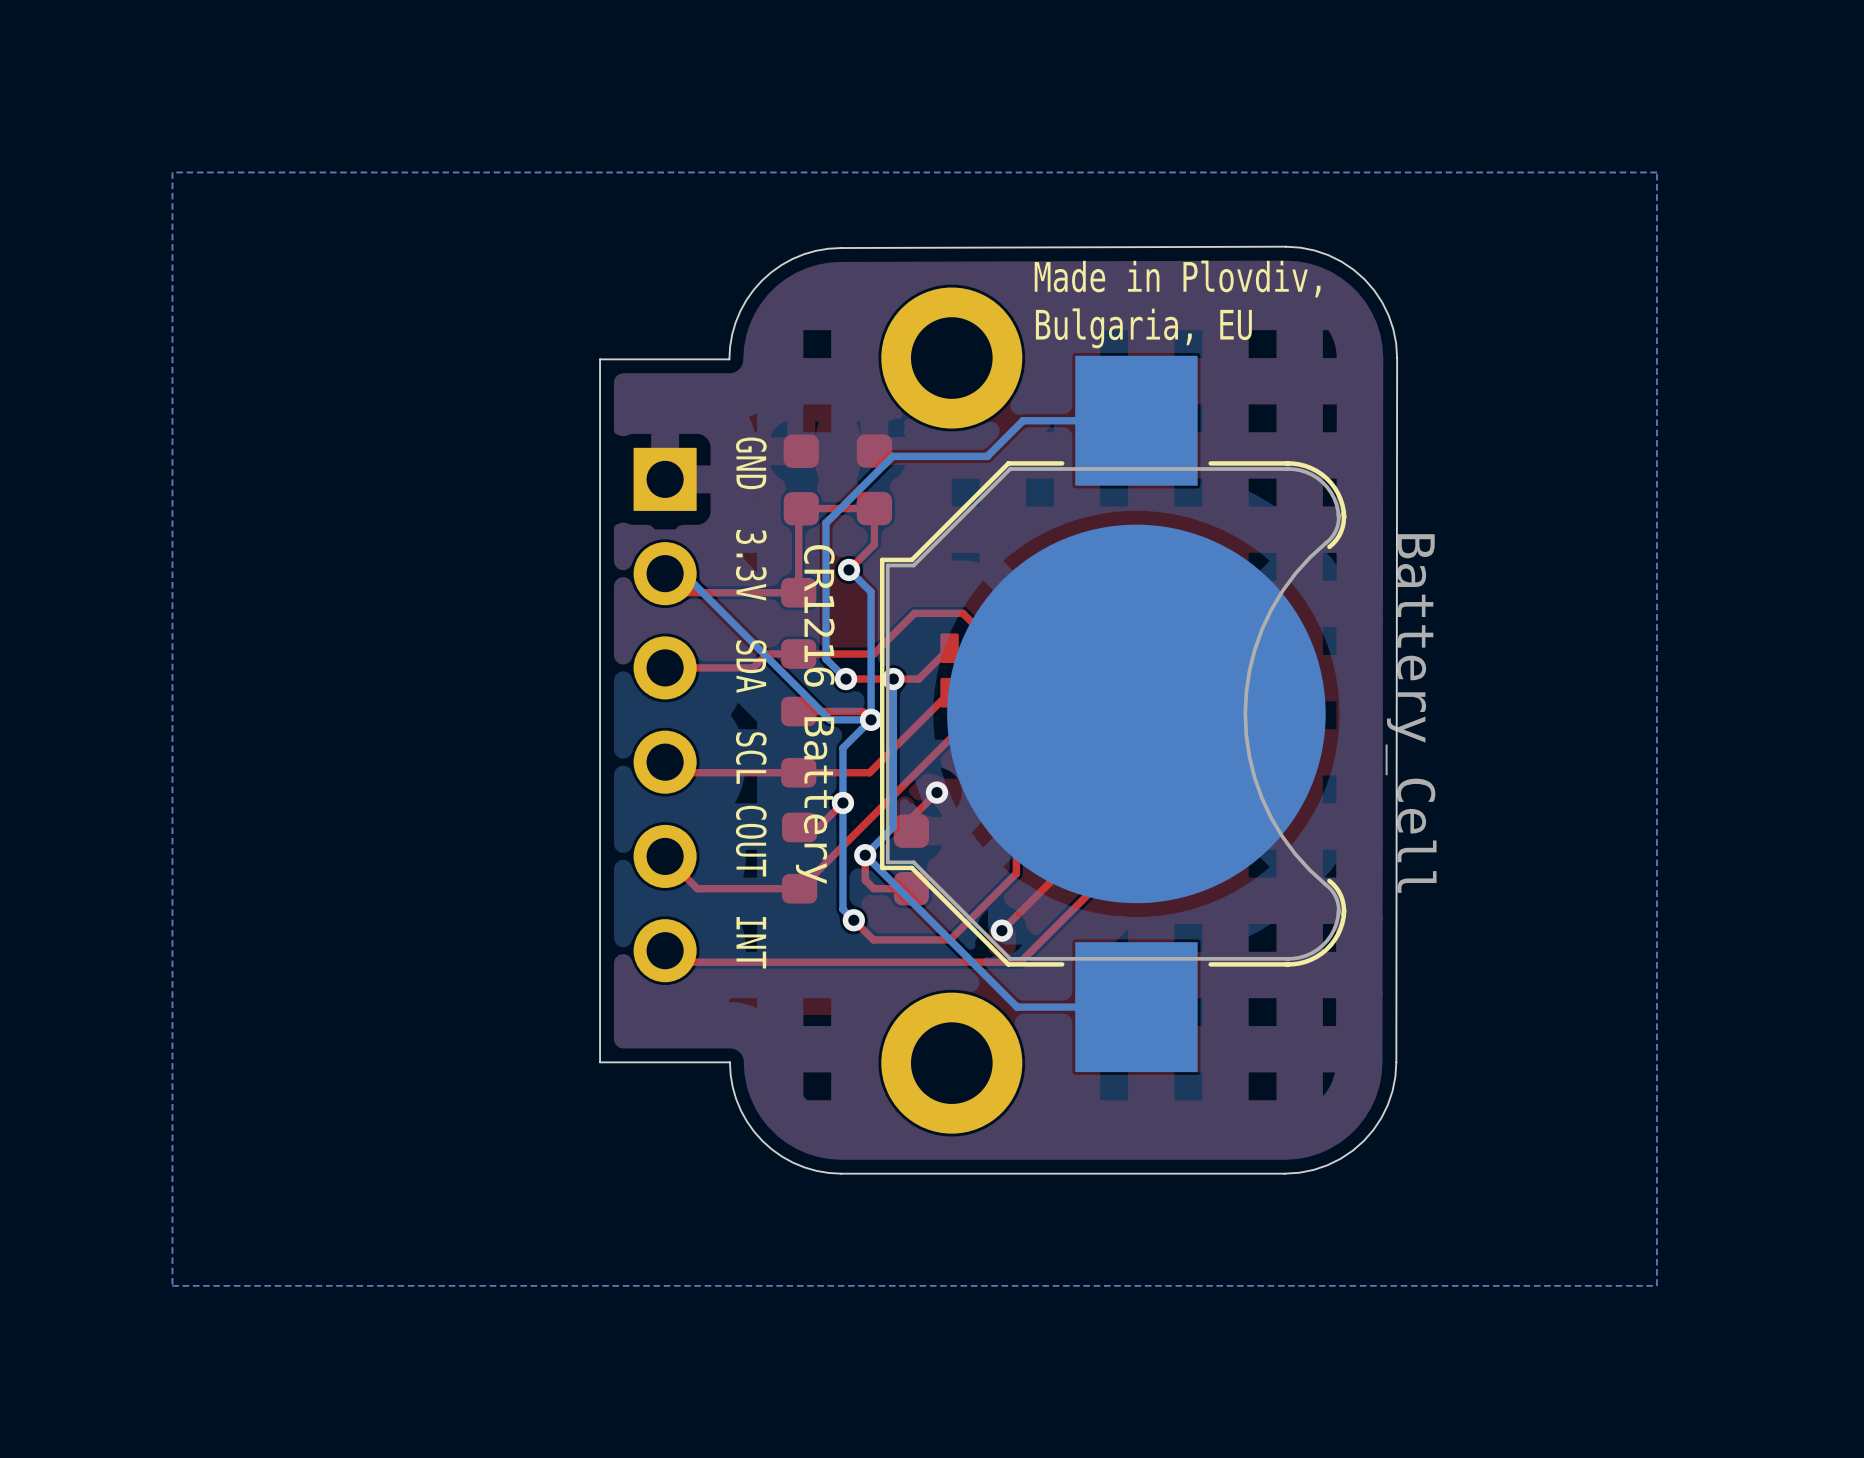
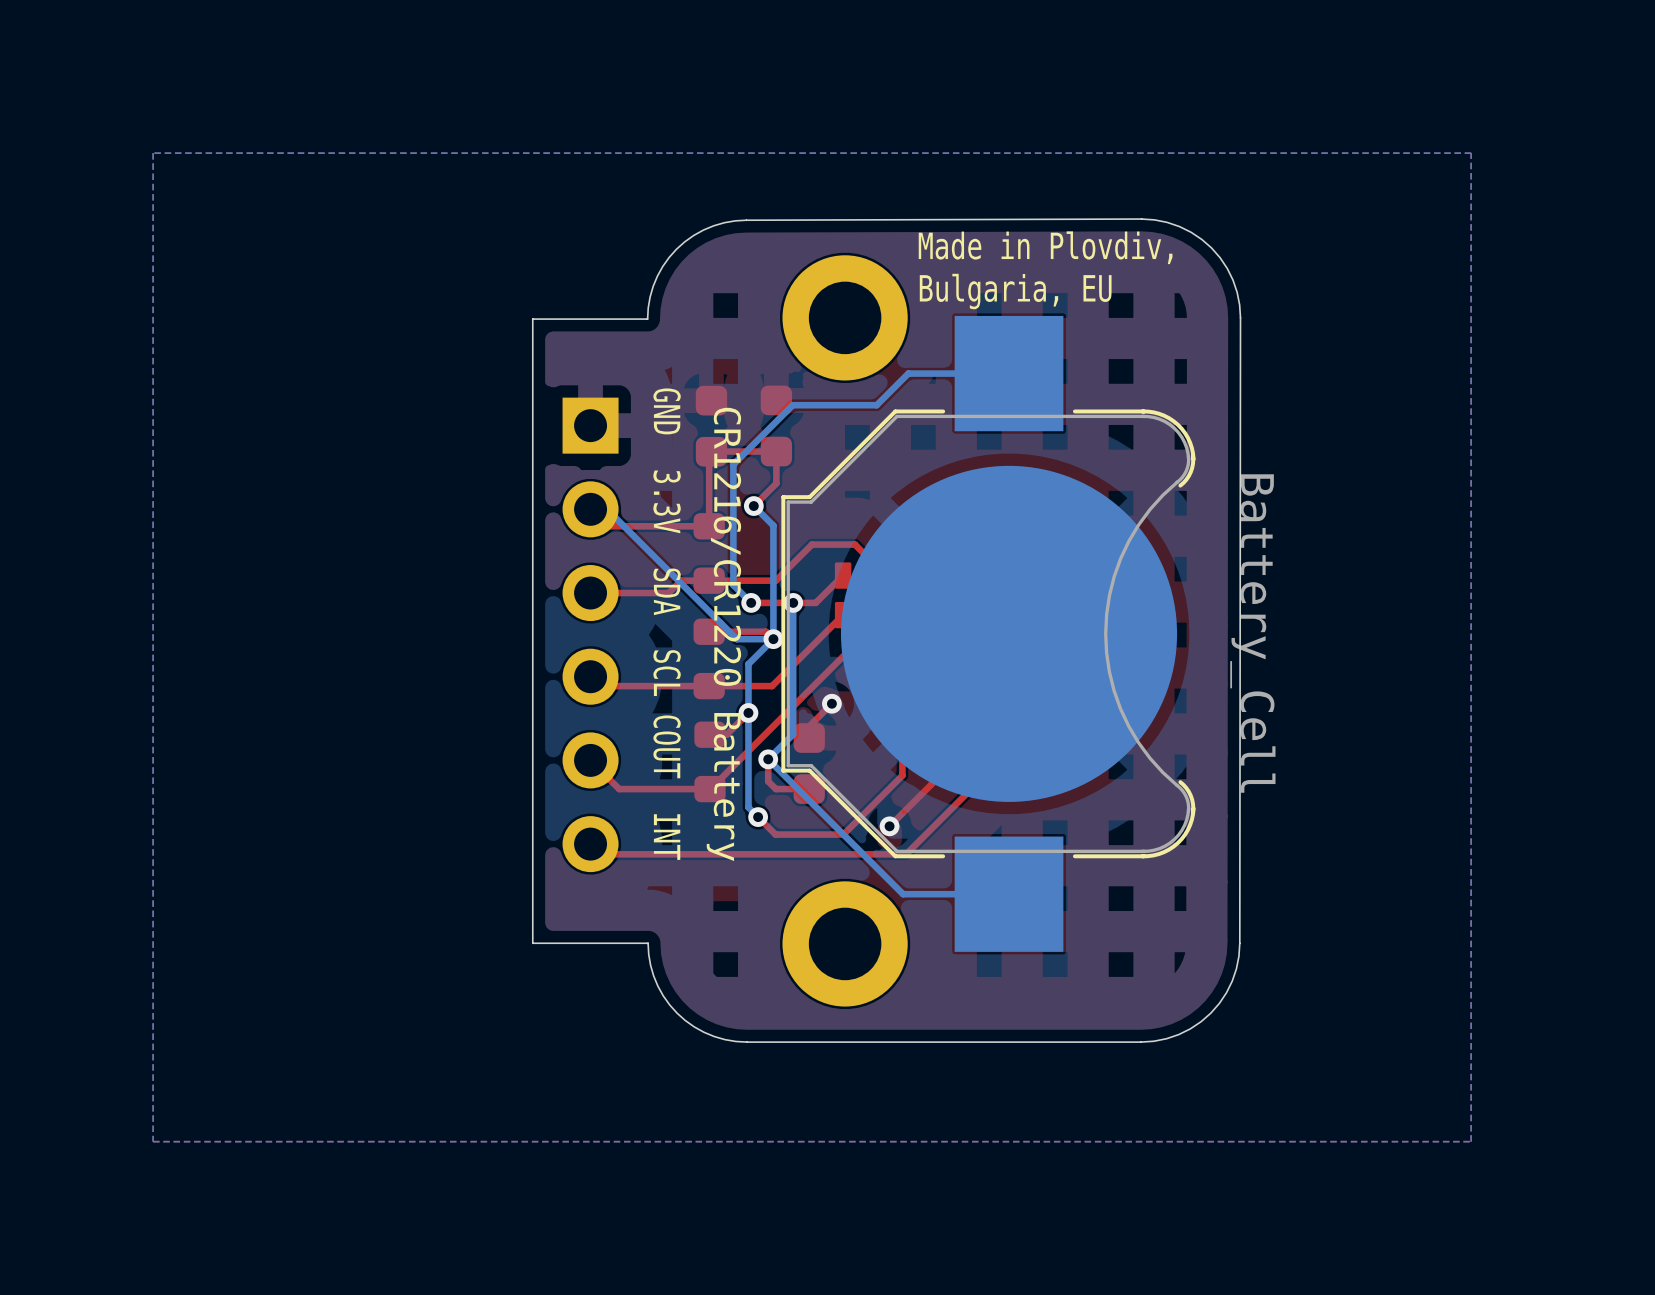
CR1216 Battery name: CR1216 Battery (815, 714) -> CR1216/CR1220 Battery (723, 634)

